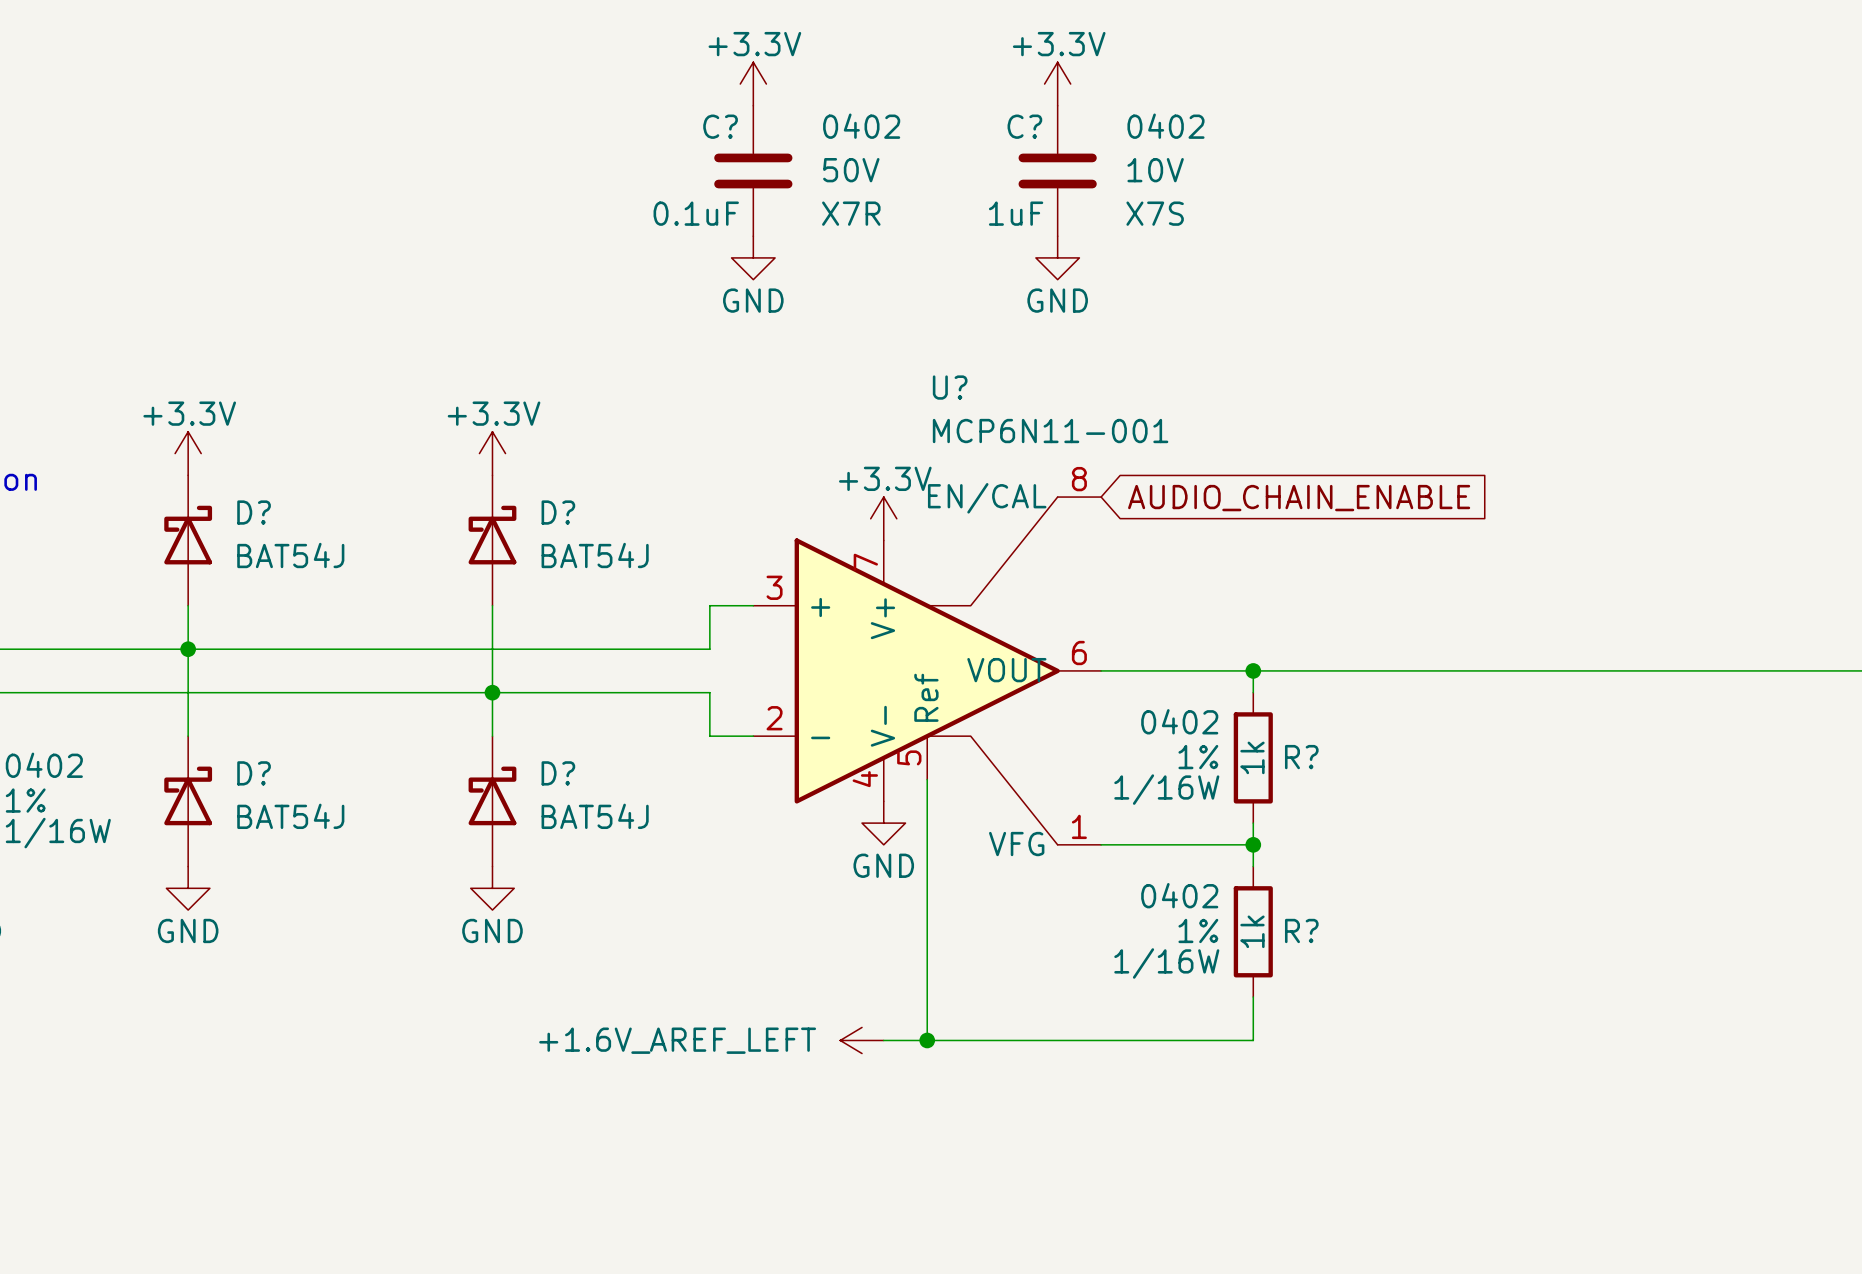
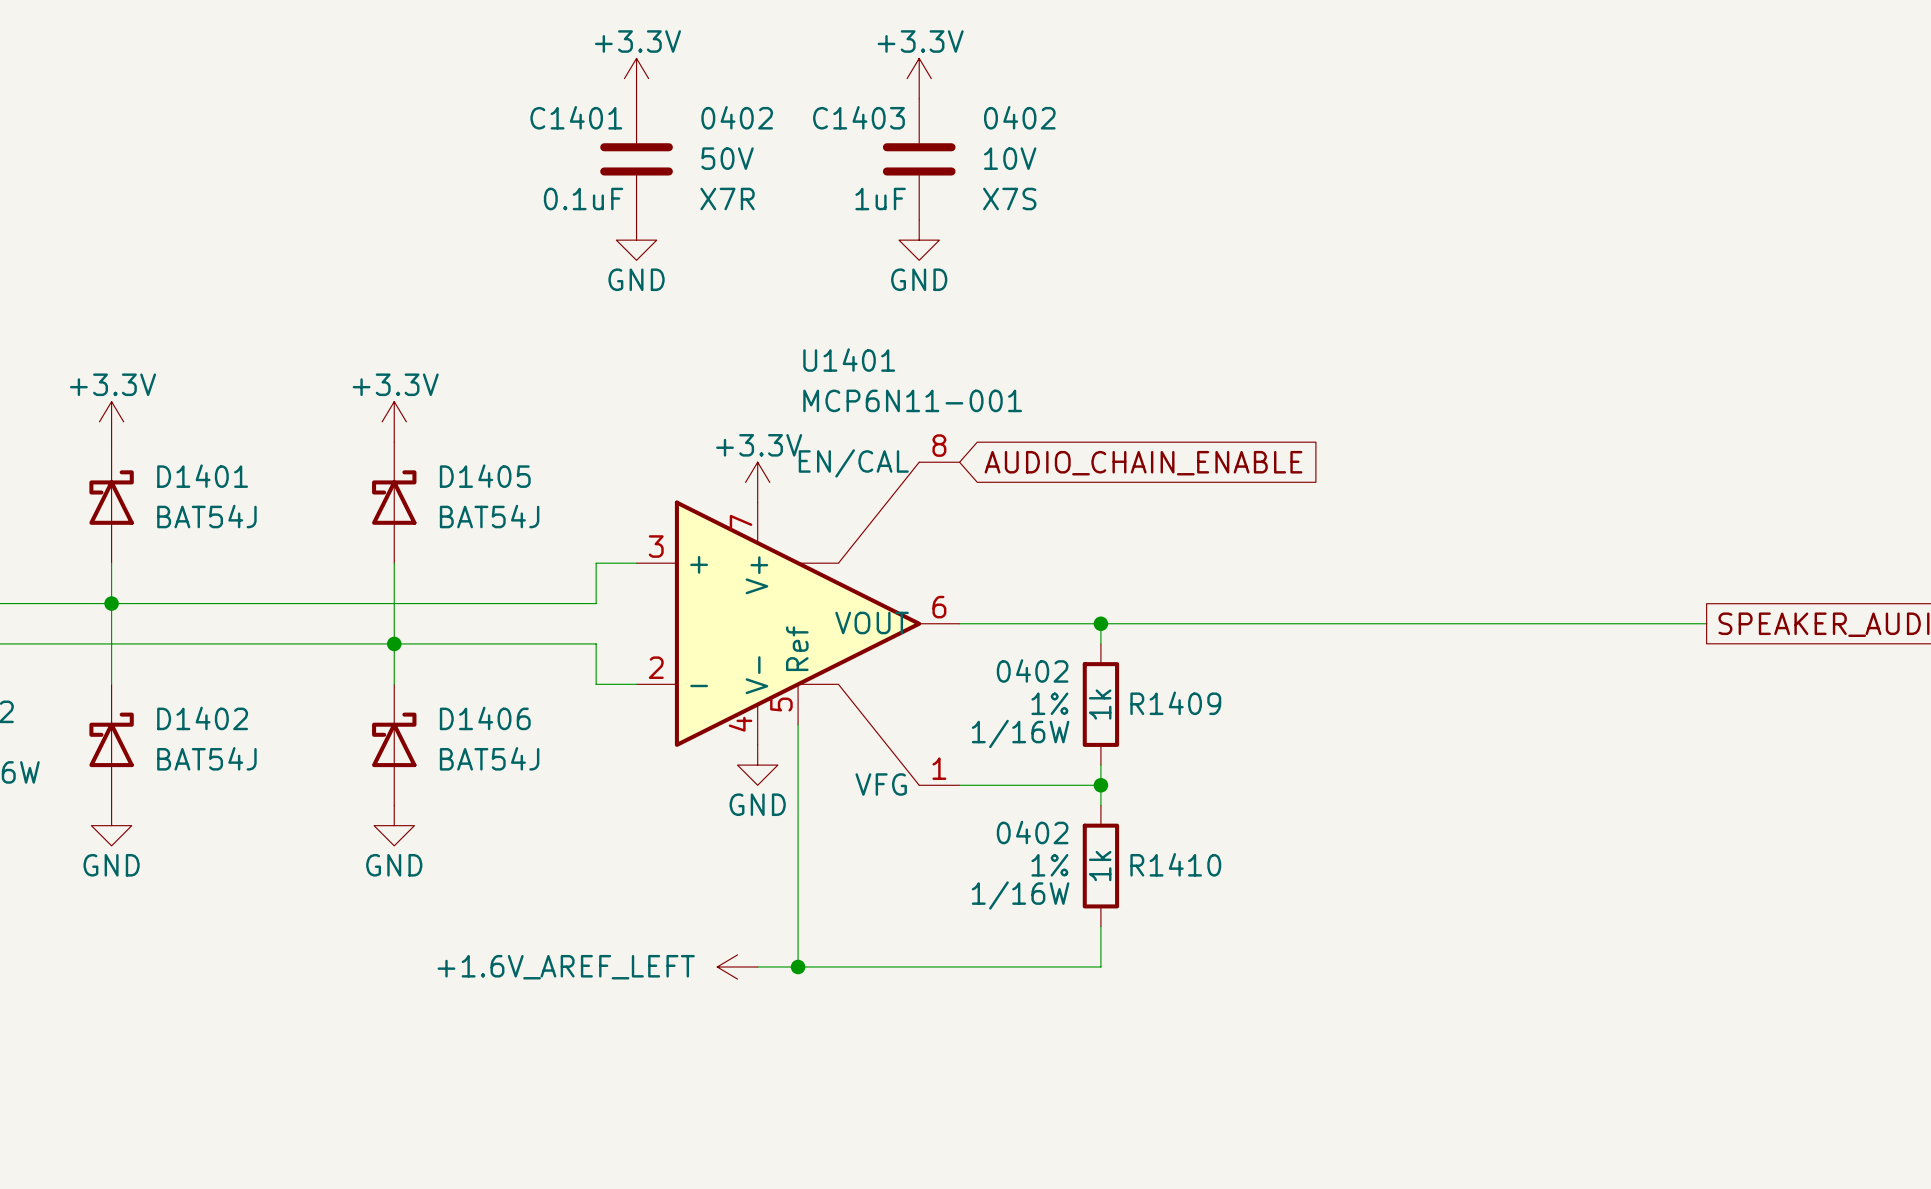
C? name: C? (720, 126) -> C1401 (576, 117)
C? name: C? (1024, 126) -> C1403 (858, 117)
U? name: U? (950, 387) -> U1401 (849, 360)
D? name: D? (254, 512) -> D1401 (202, 476)
D? name: D? (558, 512) -> D1405 (485, 476)
R? name: R? (1301, 757) -> R1409 (1175, 703)
D? name: D? (254, 773) -> D1402 (202, 718)
D? name: D? (558, 773) -> D1406 (485, 718)
R? name: R? (1301, 930) -> R1410 (1175, 864)

